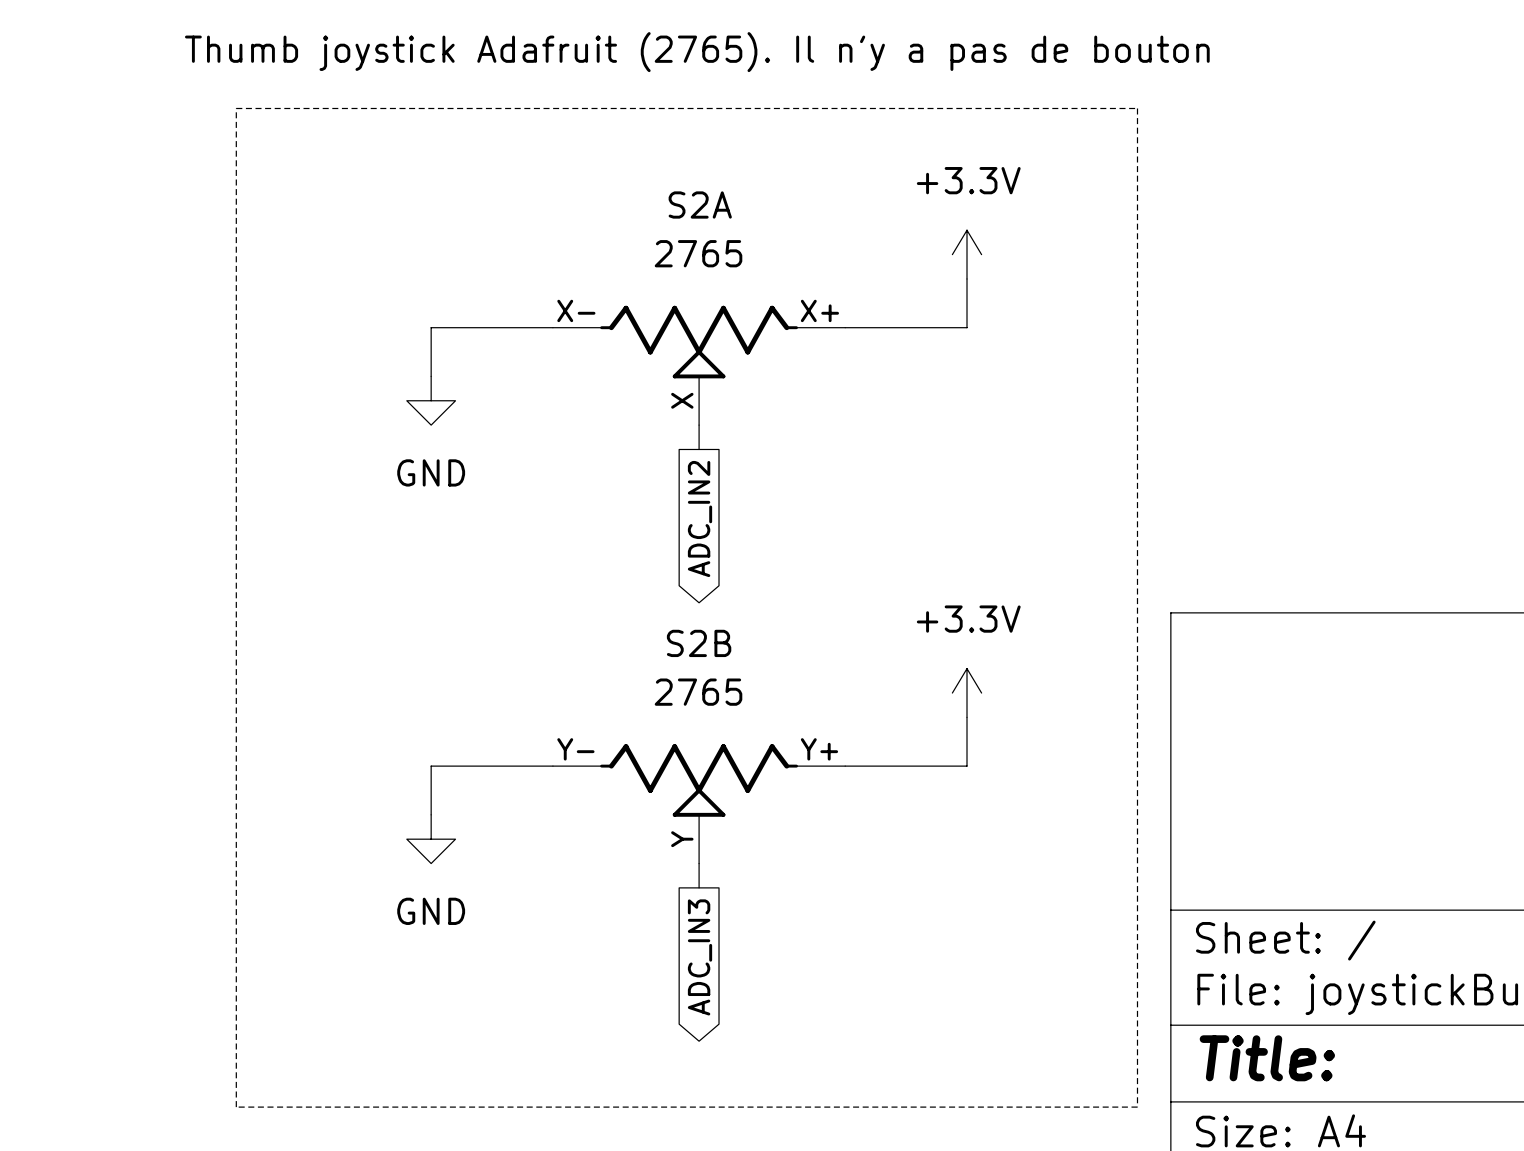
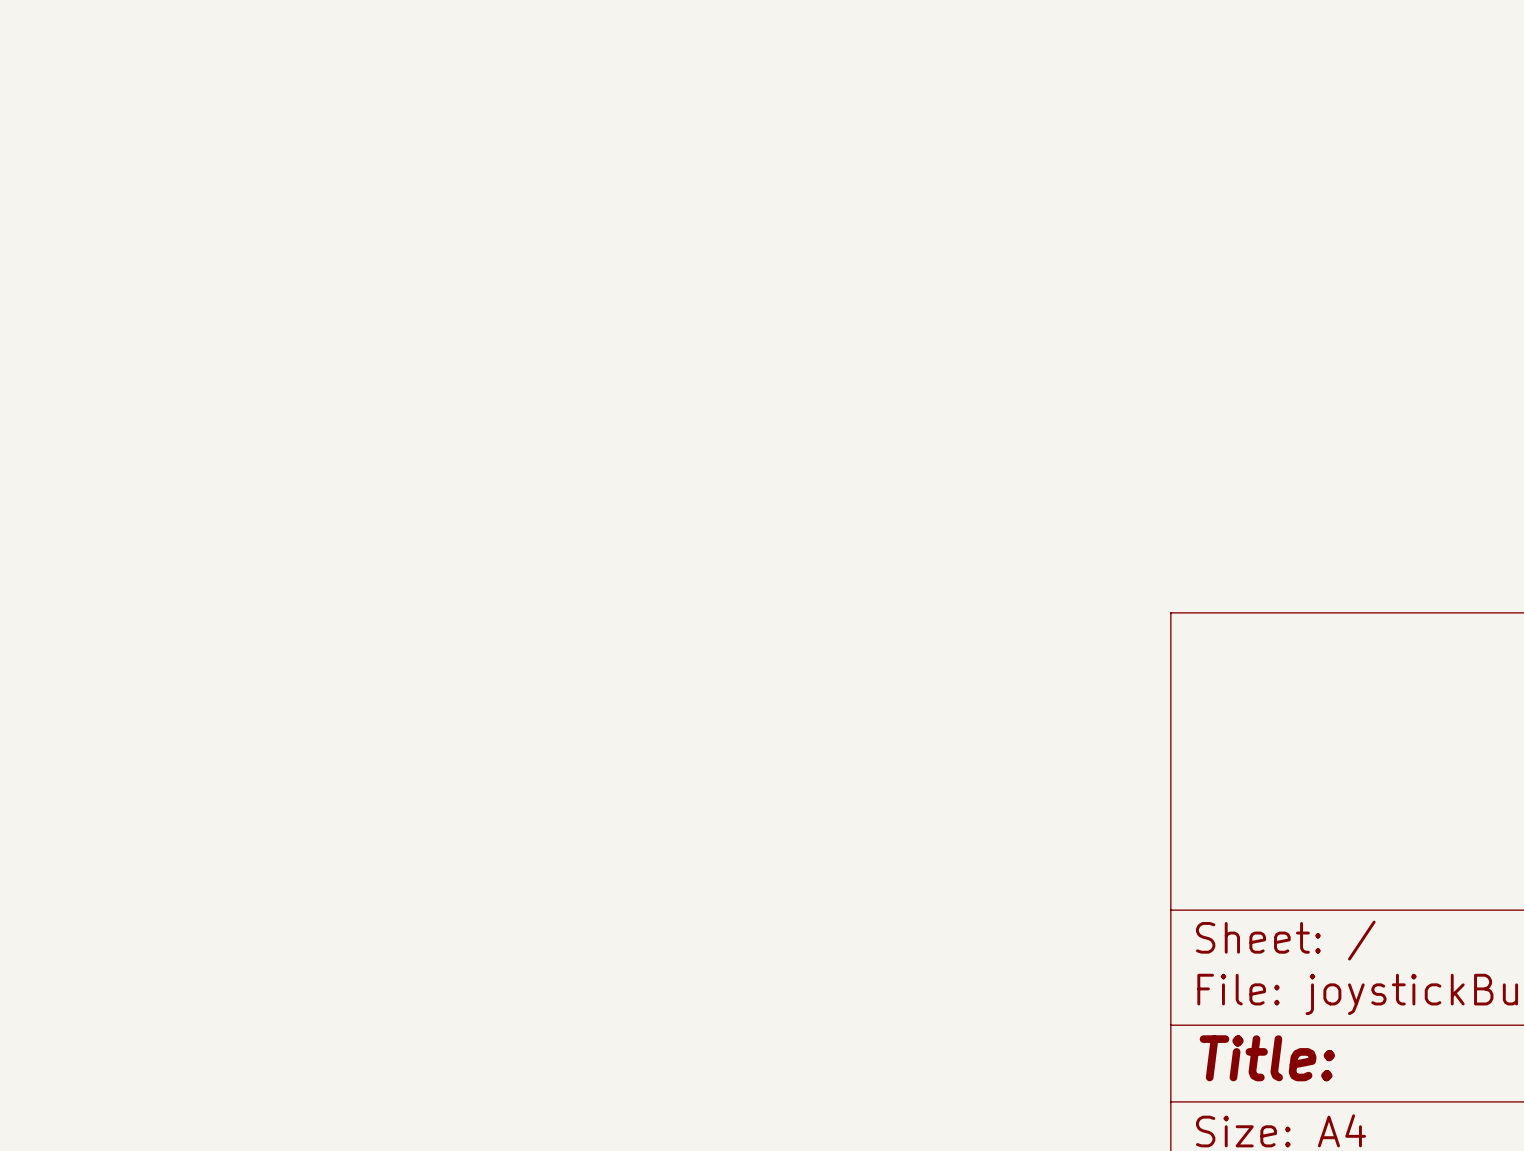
text: Thumb joystick Adafruit (2765). Il n'y a pas de bouton (697, 52) -> none
line: (236, 108) (1137, 108) (1137, 1107) (236, 1107) (236, 108) -> none
power symbol: +3.3V (967, 254) -> none
wire: (967, 278) (967, 327) (845, 327) -> none
wire: (552, 327) (431, 327) (431, 376) -> none
S2A: 2765 (699, 365) -> none
power symbol: GND (431, 400) -> none
wire: (699, 425) (699, 449) -> none
global label: ADC_IN2 (700, 519) -> none
power symbol: +3.3V (967, 693) -> none
wire: (967, 717) (967, 766) (845, 766) -> none
wire: (552, 766) (431, 766) (431, 814) -> none
S2B: 2765 (699, 803) -> none
power symbol: GND (431, 839) -> none
wire: (699, 863) (699, 887) -> none
global label: ADC_IN3 (700, 957) -> none

